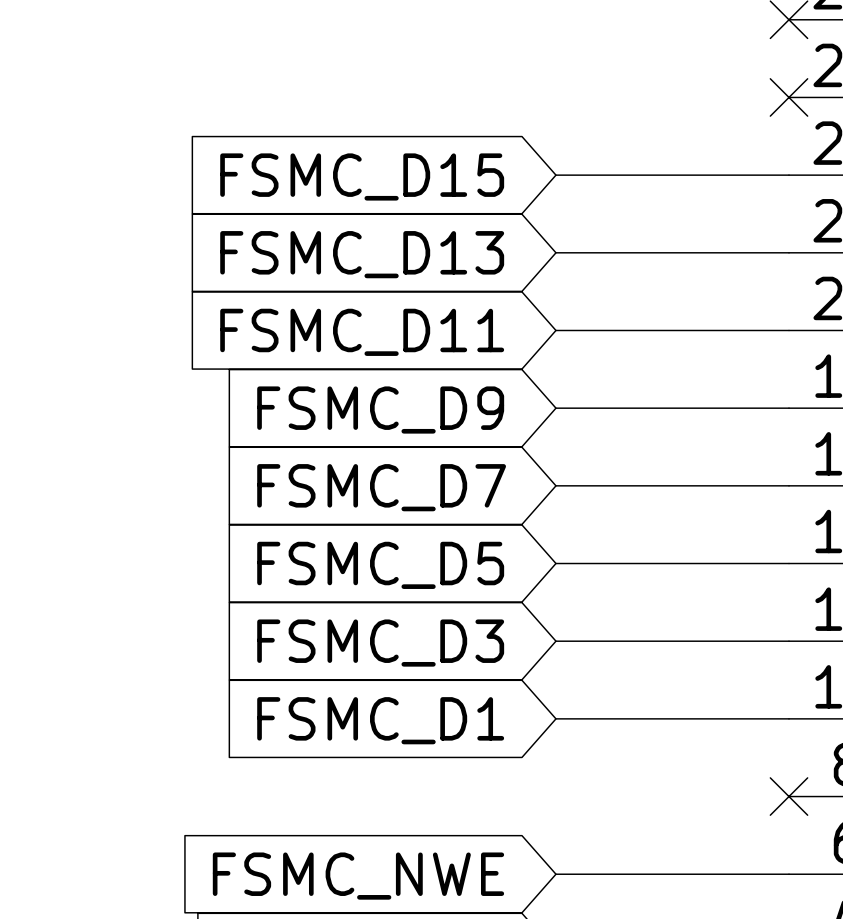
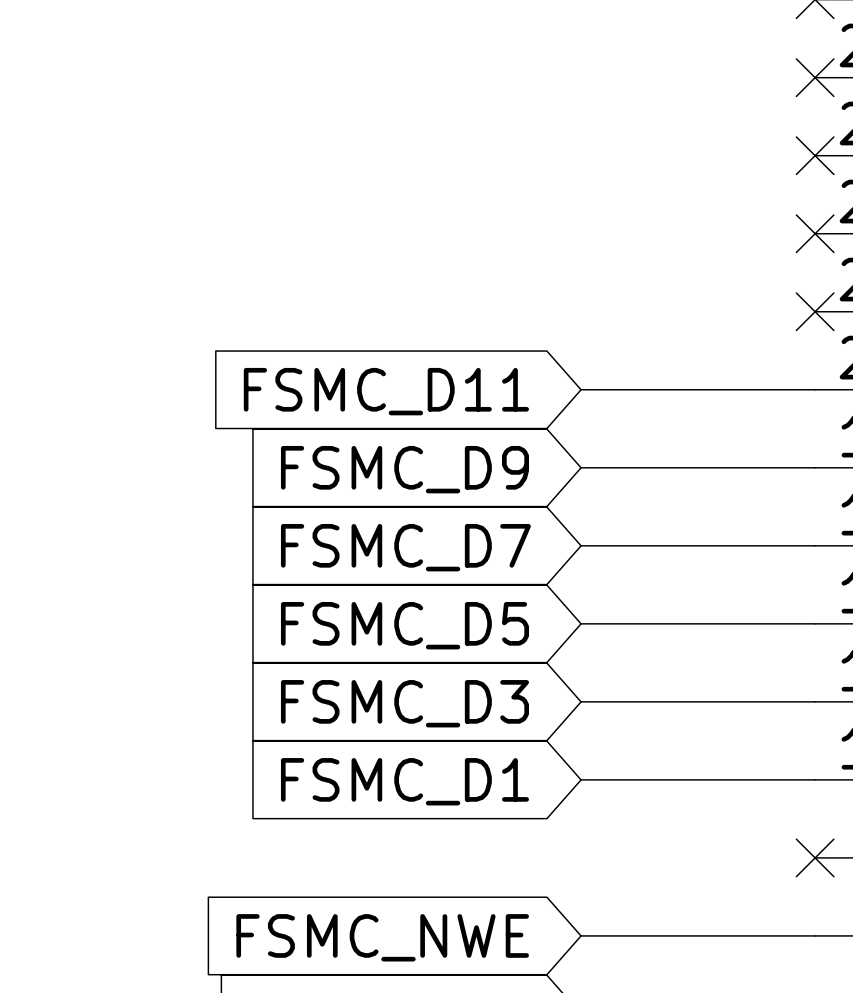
wire: (555, 175) (788, 175) -> none
no-connect mark: none -> (815, 233)
global label: FSMC_D15 (362, 176) -> none
wire: (555, 252) (788, 252) -> none
no-connect mark: none -> (815, 311)
global label: FSMC_D13 (362, 254) -> none

